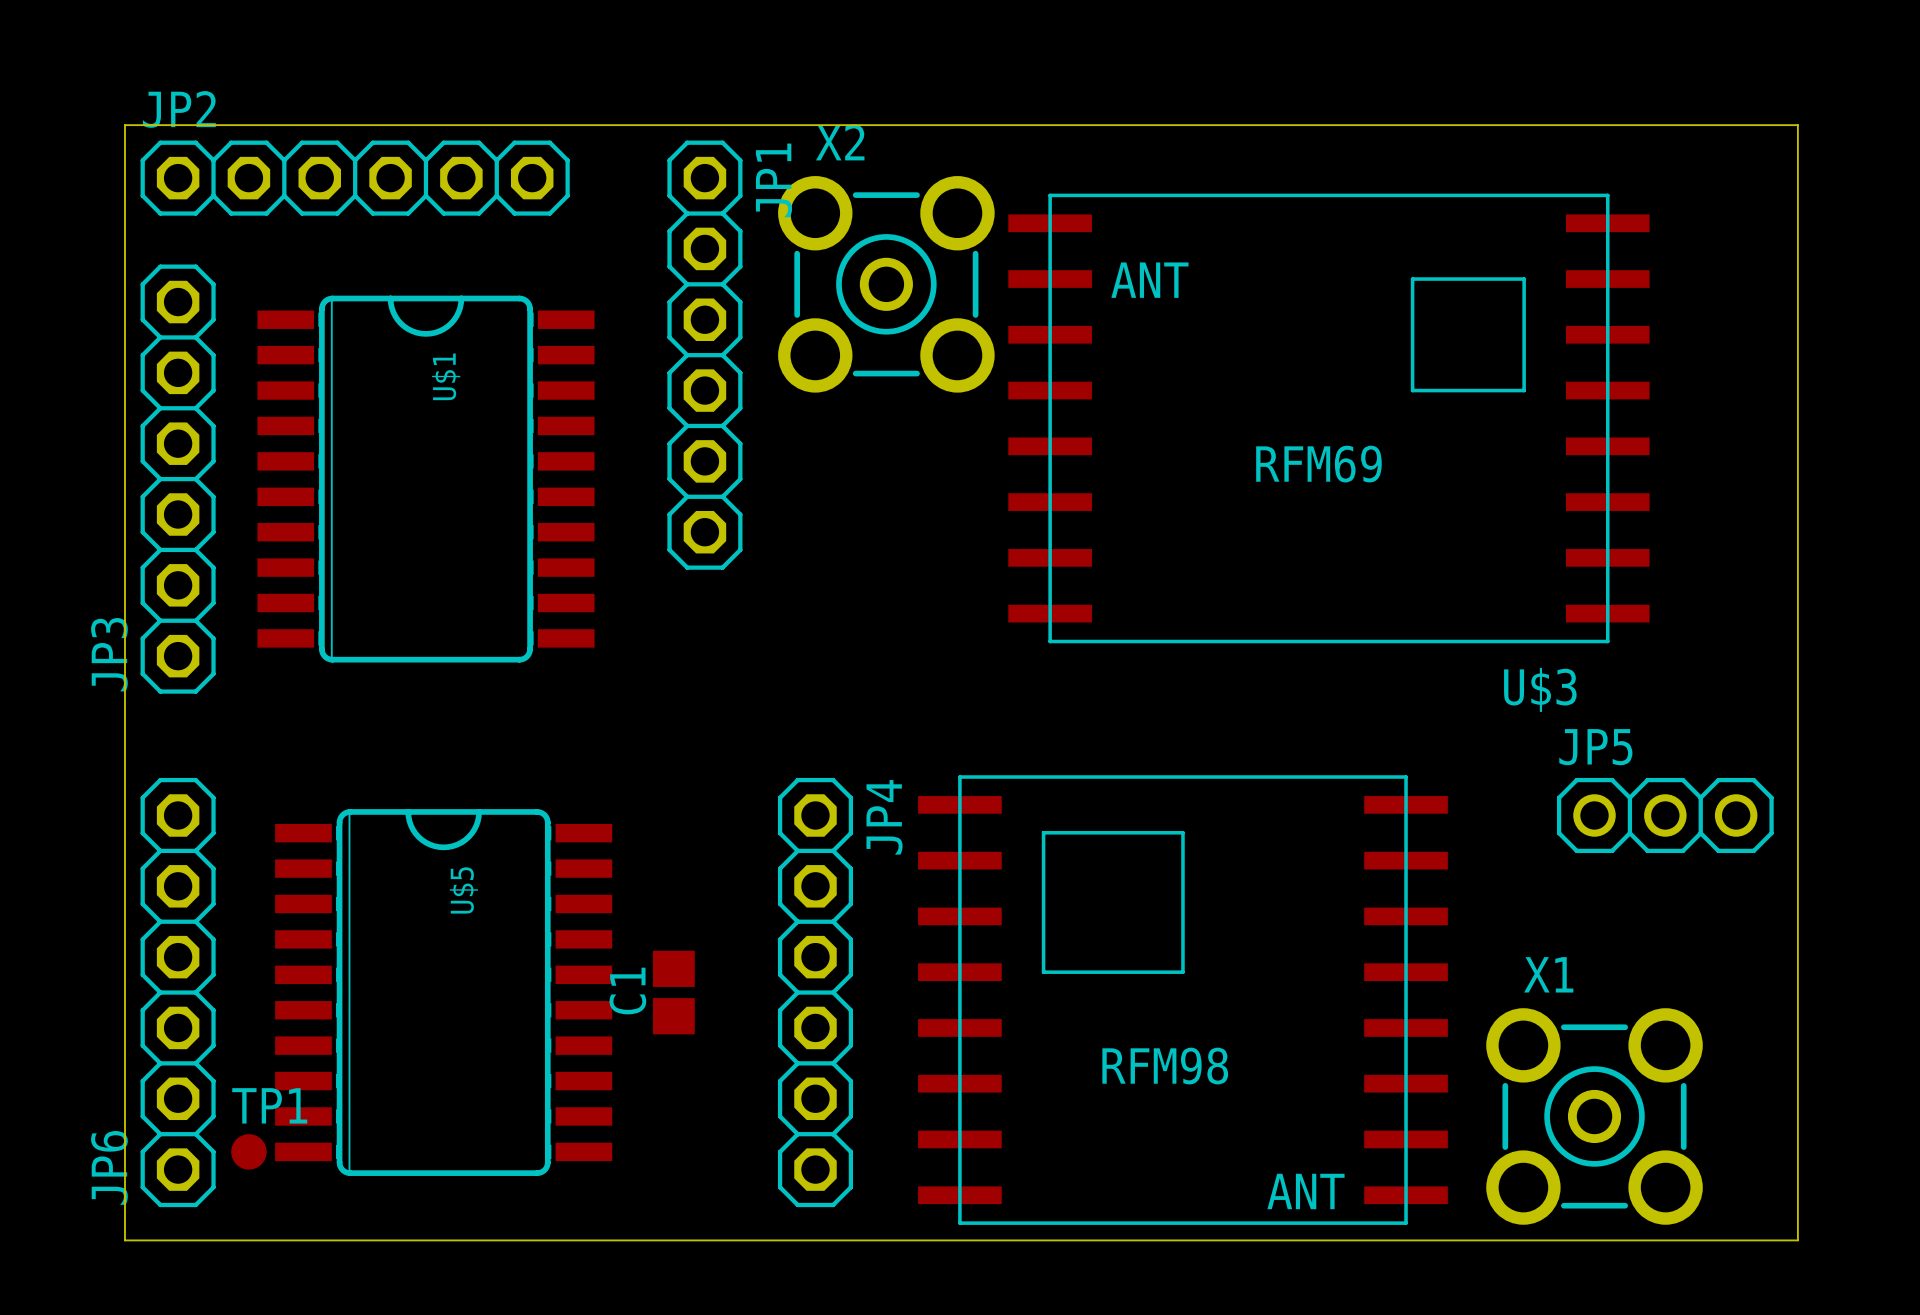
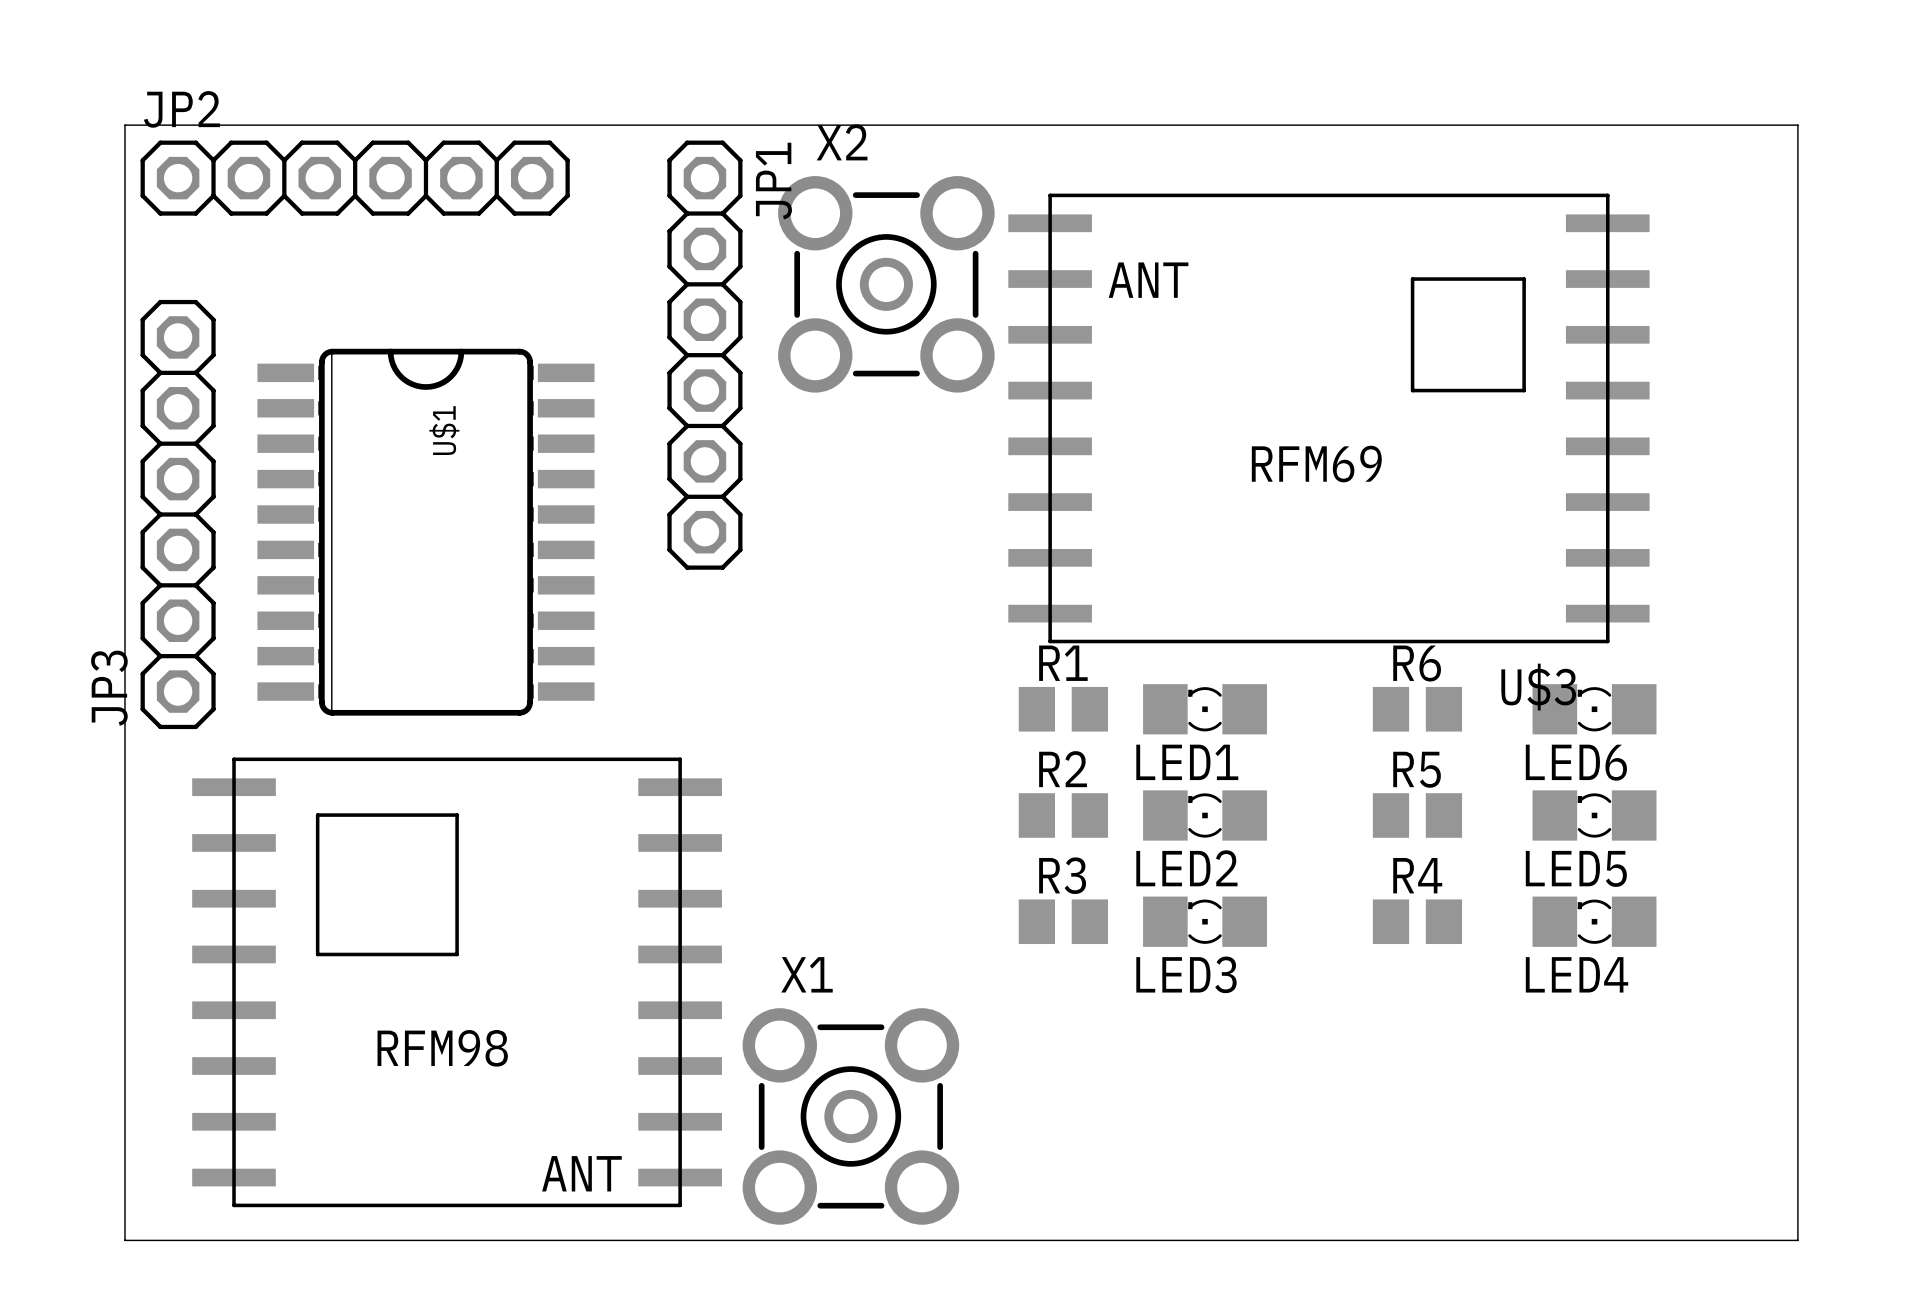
JP3 position: (178, 479) -> (178, 514)
U$1 position: (425, 479) -> (425, 532)
R1: none -> (1063, 709)
LED1: none -> (1205, 709)
R6: none -> (1417, 709)
LED6: none -> (1594, 709)
R2: none -> (1063, 815)
LED2: none -> (1205, 815)
R5: none -> (1417, 815)
LED5: none -> (1594, 815)
JP5: (1665, 815) -> none
R3: none -> (1063, 921)
LED3: none -> (1205, 921)
R4: none -> (1417, 921)
LED4: none -> (1594, 921)
part: none -> (457, 982)
JP6: (178, 992) -> none
U$5: (443, 992) -> none
C1: (673, 992) -> none
JP4: (815, 992) -> none
part: (1182, 1000) -> none
X1 position: (1594, 1116) -> (850, 1116)
TP1: (248, 1151) -> none

